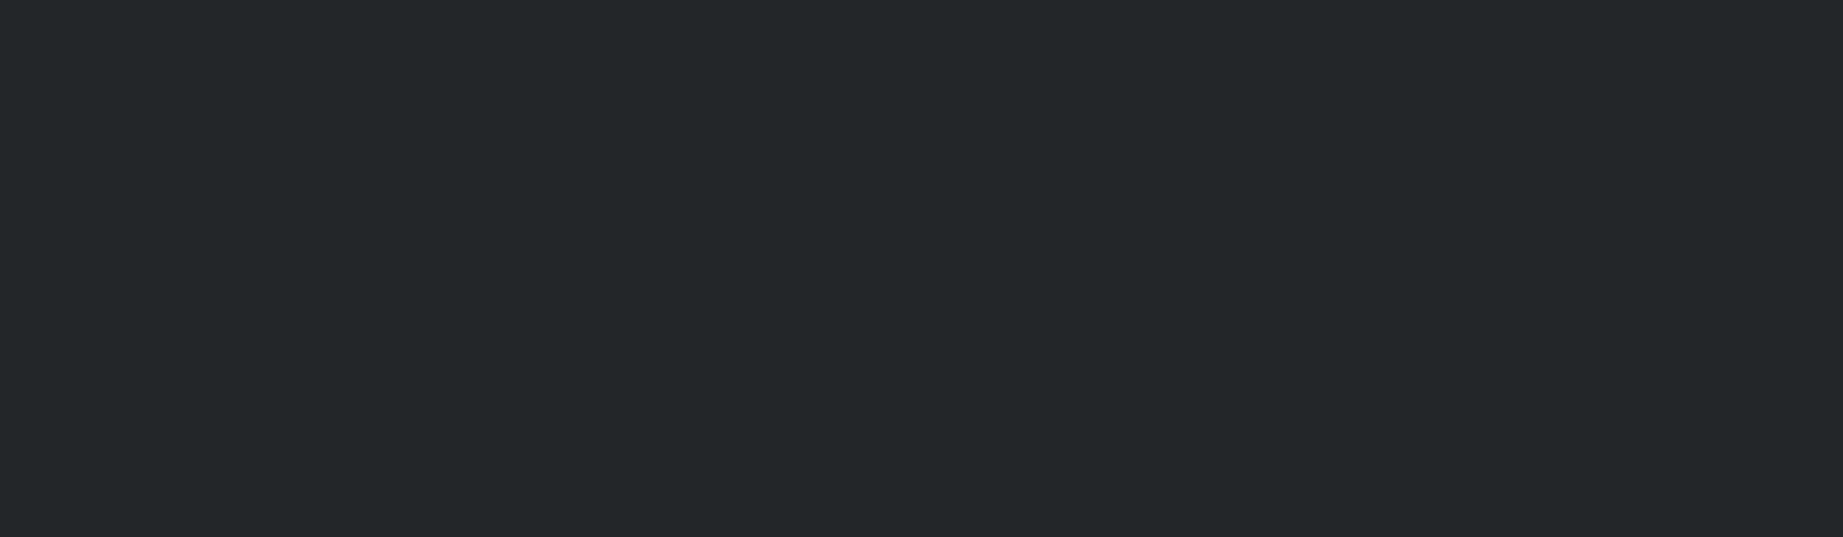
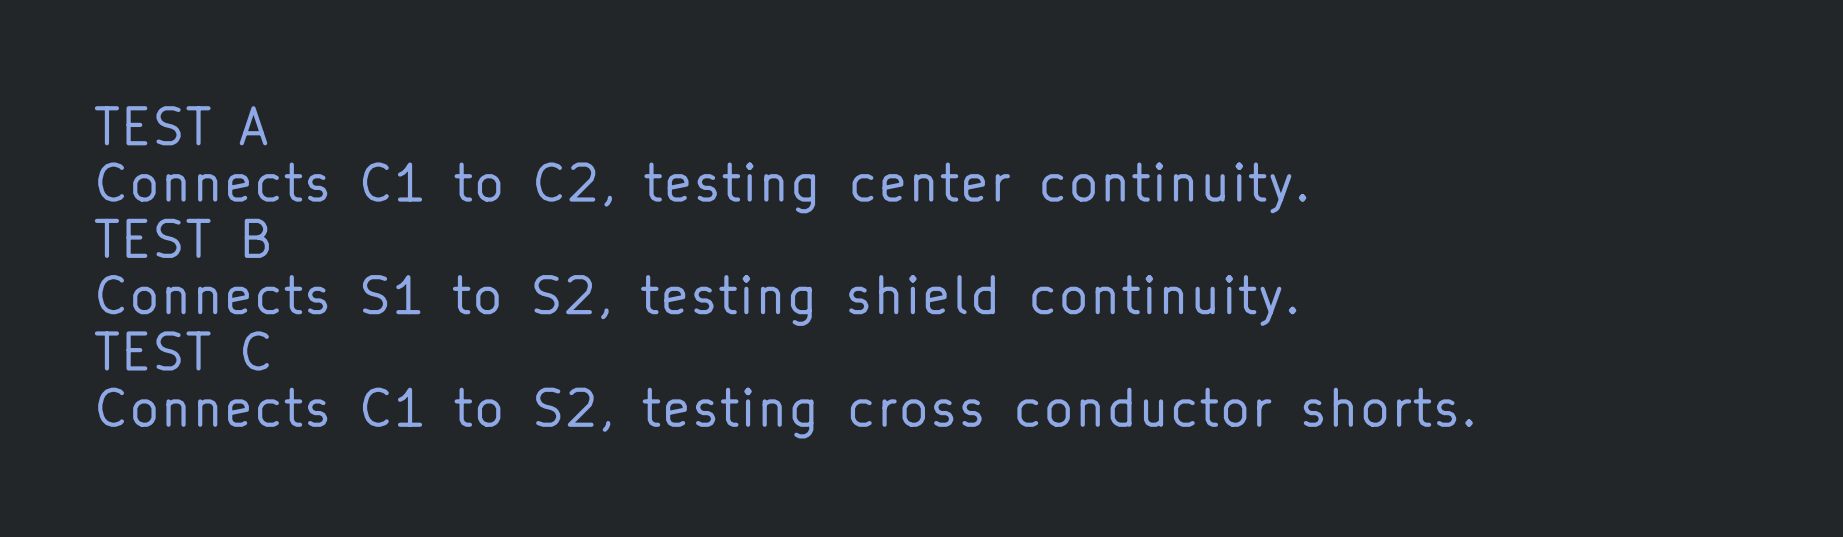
text: none -> TEST A (181, 125)
text: none -> Connects C1 to C2, testing center continuity. (702, 187)
text: none -> TEST B (181, 238)
text: none -> Connects S1 to S2, testing shield continuity. (697, 300)
text: none -> TEST C (181, 350)
text: none -> Connects C1 to S2, testing cross conductor shorts. (785, 413)

